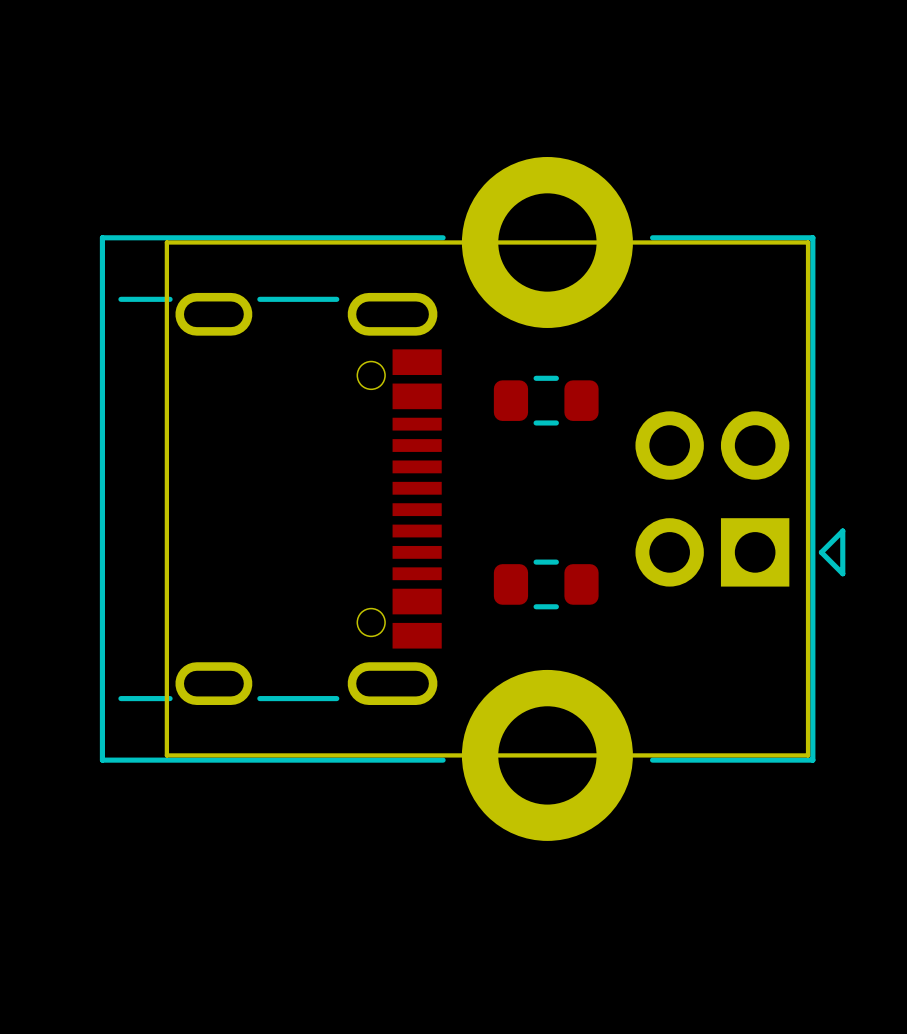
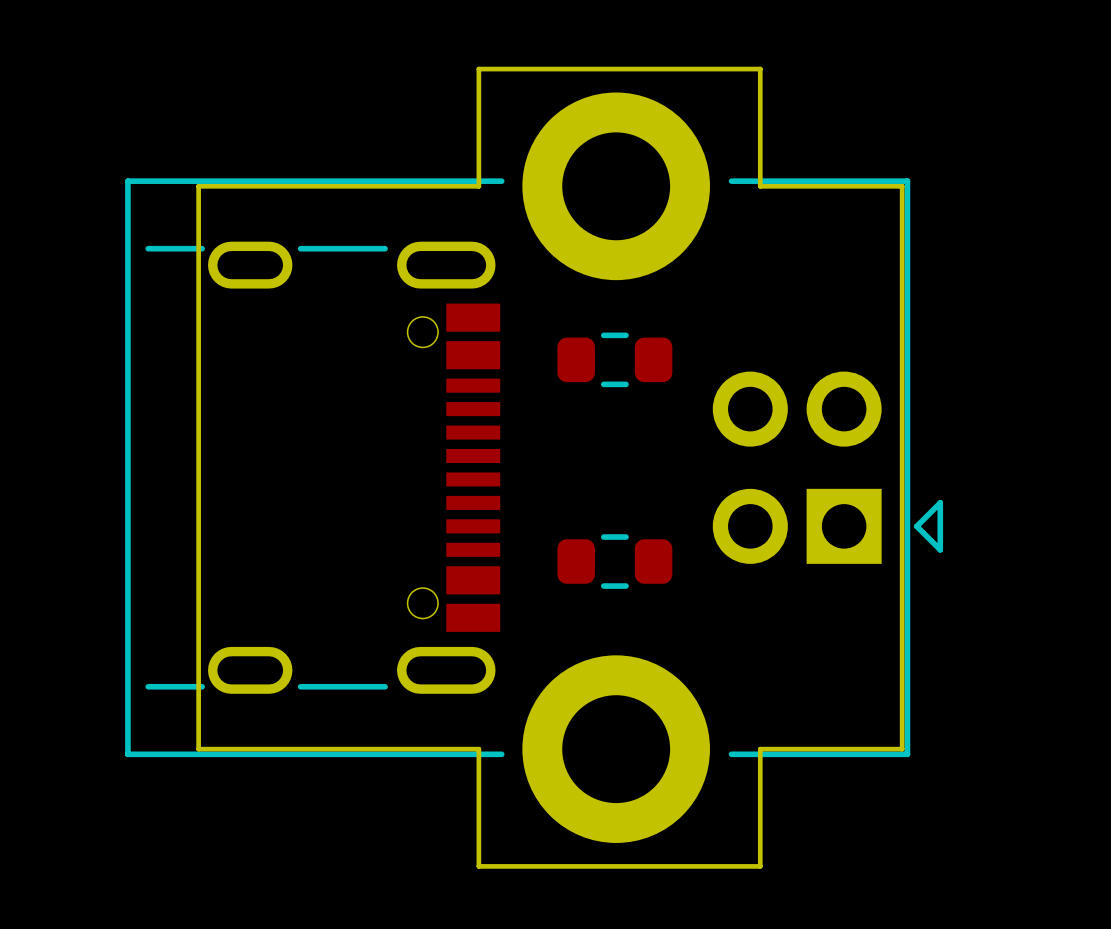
board edge: (422, 242) (678, 242) -> (478, 186) (478, 69) (760, 69) (760, 186)
board edge: (422, 755) (678, 755) -> (478, 749) (478, 866) (760, 866) (760, 749)

